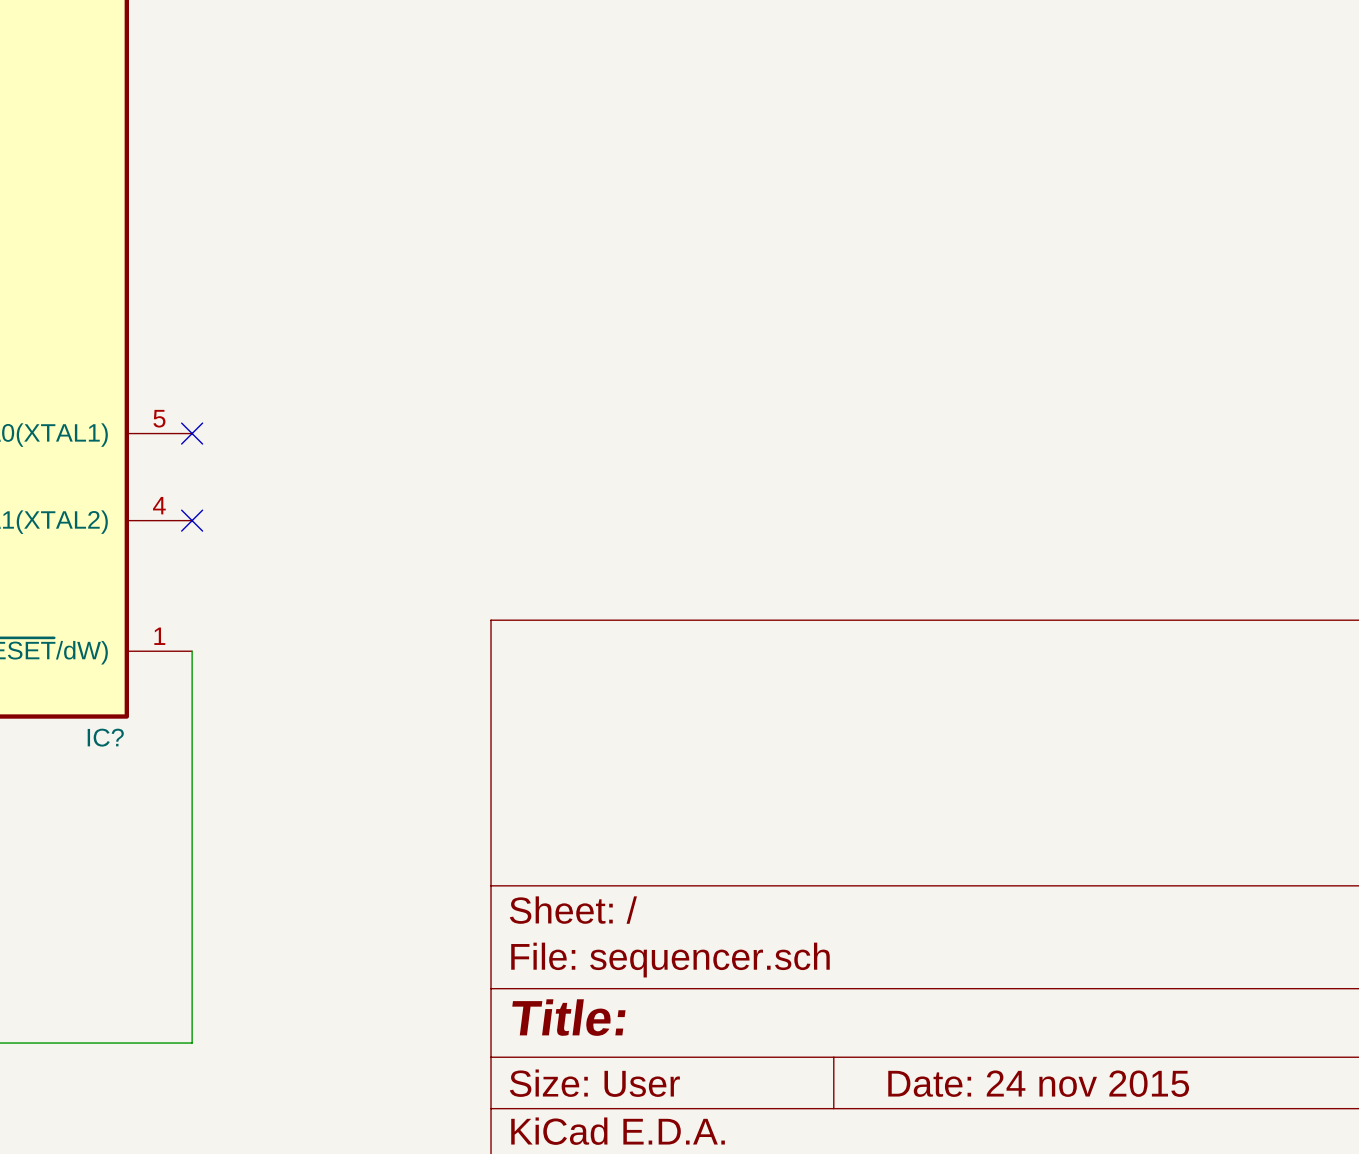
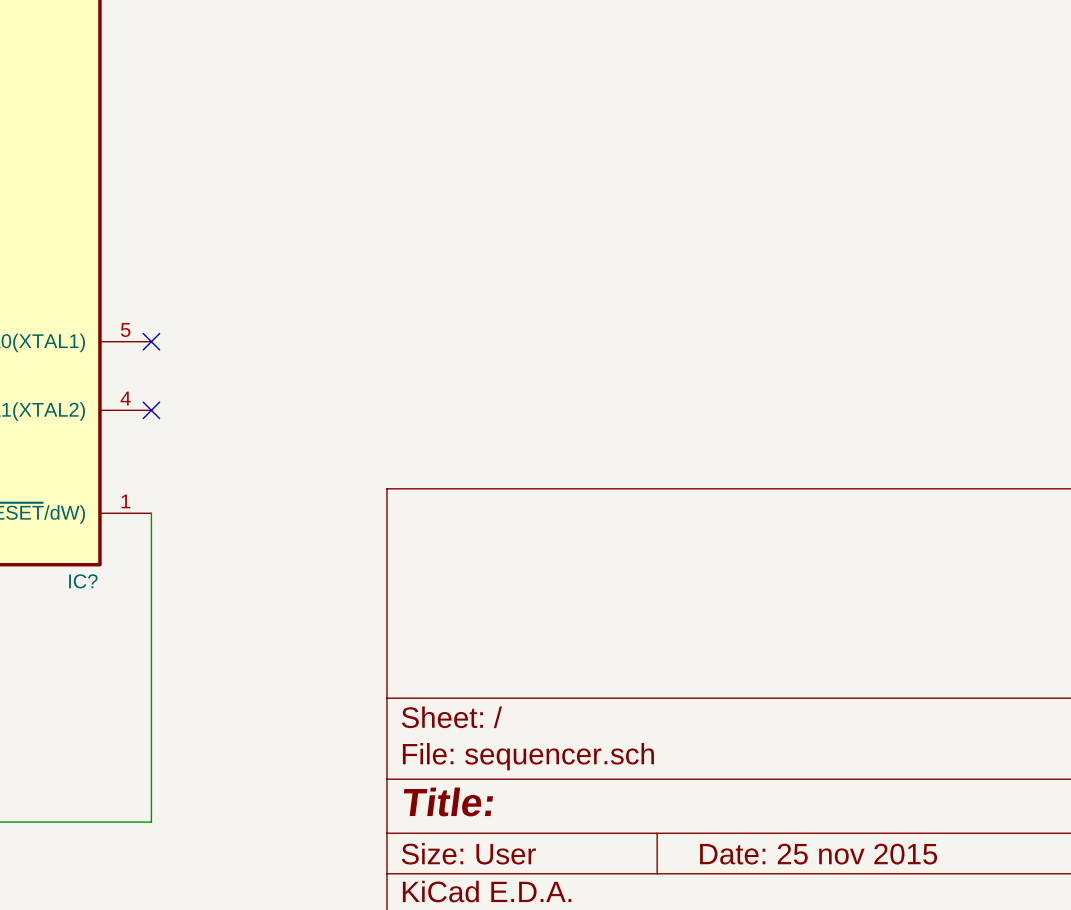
title block: Date: 24 nov 2015 (1038, 1083) -> Date: 25 nov 2015 (818, 854)

